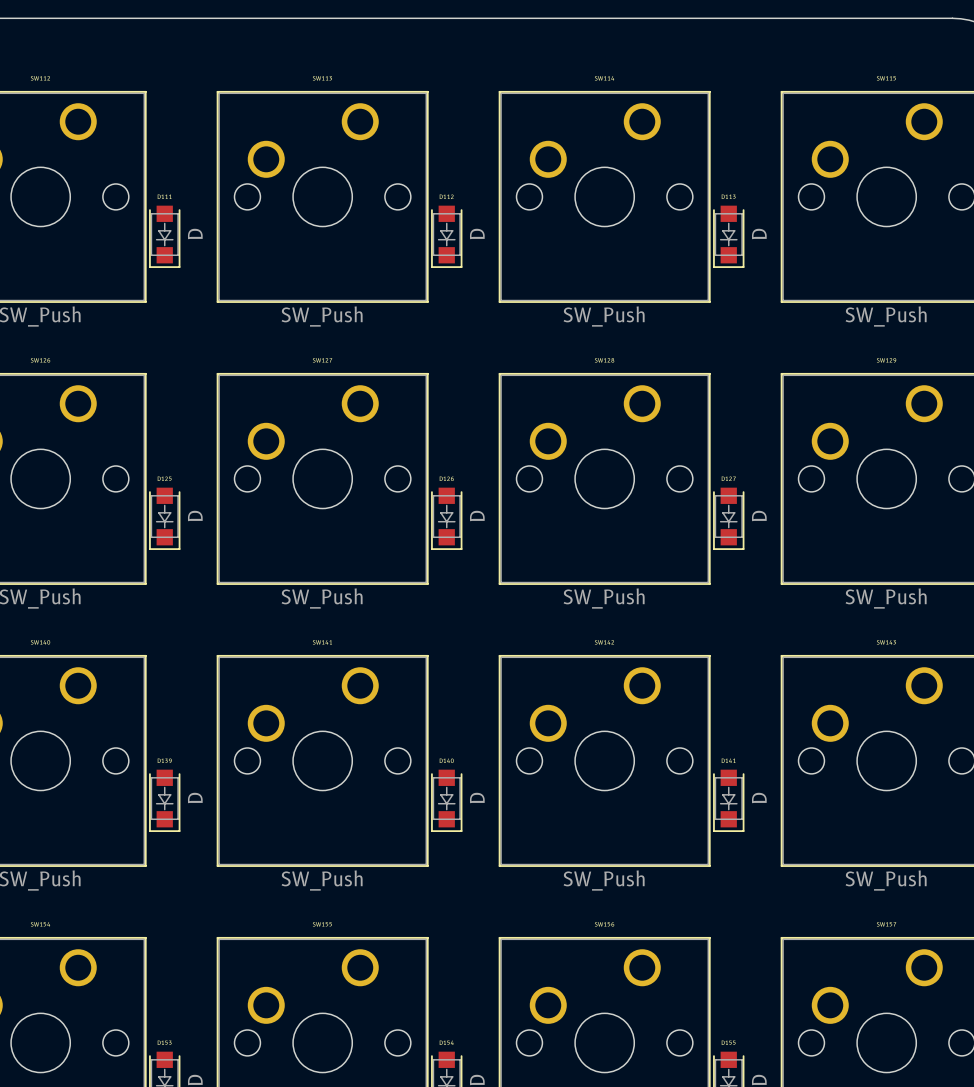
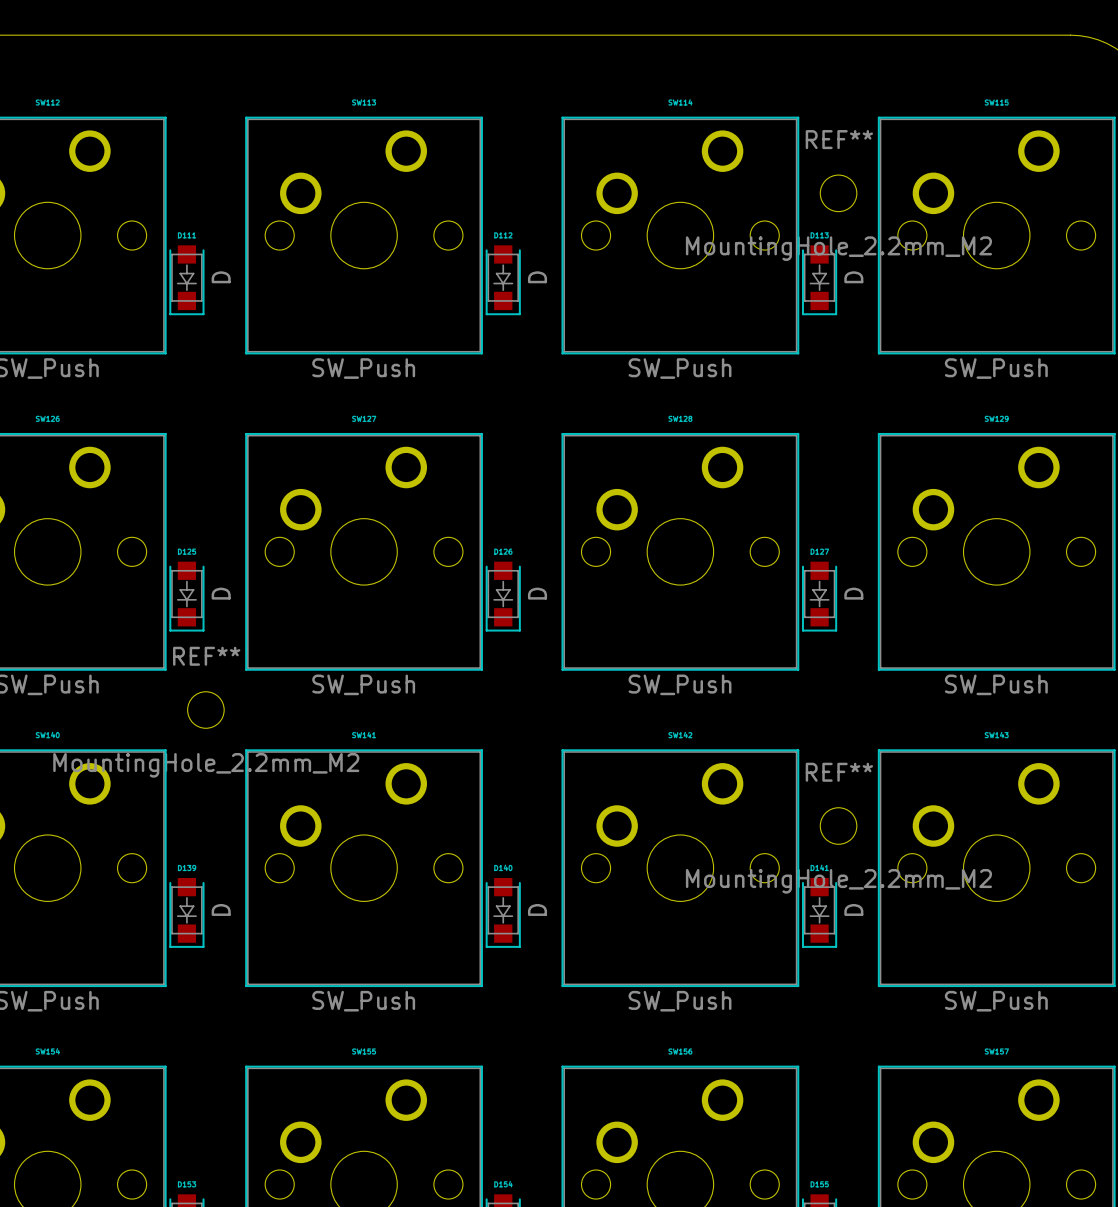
REF**: none -> MountingHole_2.2mm_M2 (838, 193)
REF**: none -> MountingHole_2.2mm_M2 (205, 710)
REF**: none -> MountingHole_2.2mm_M2 (838, 826)

